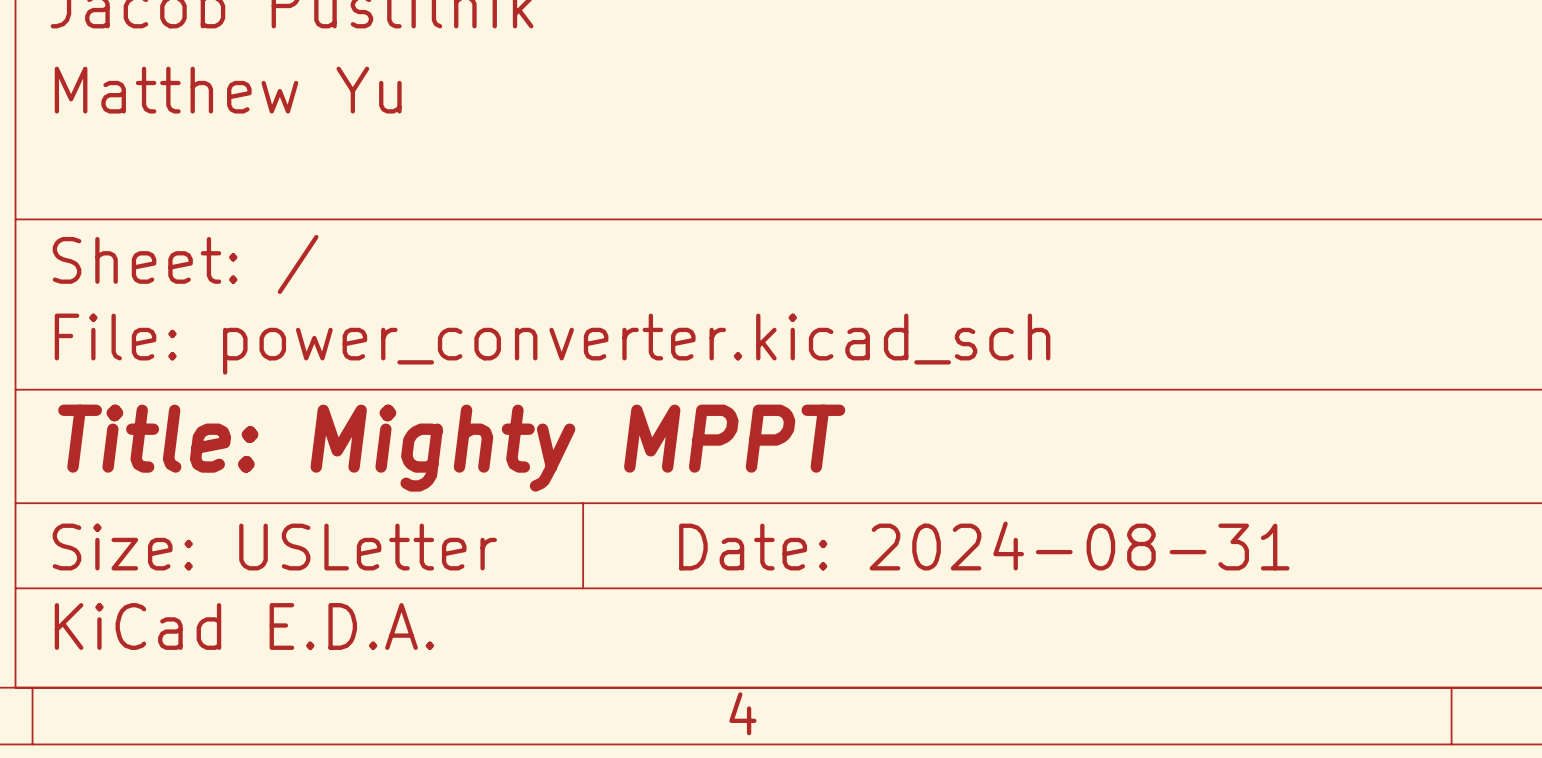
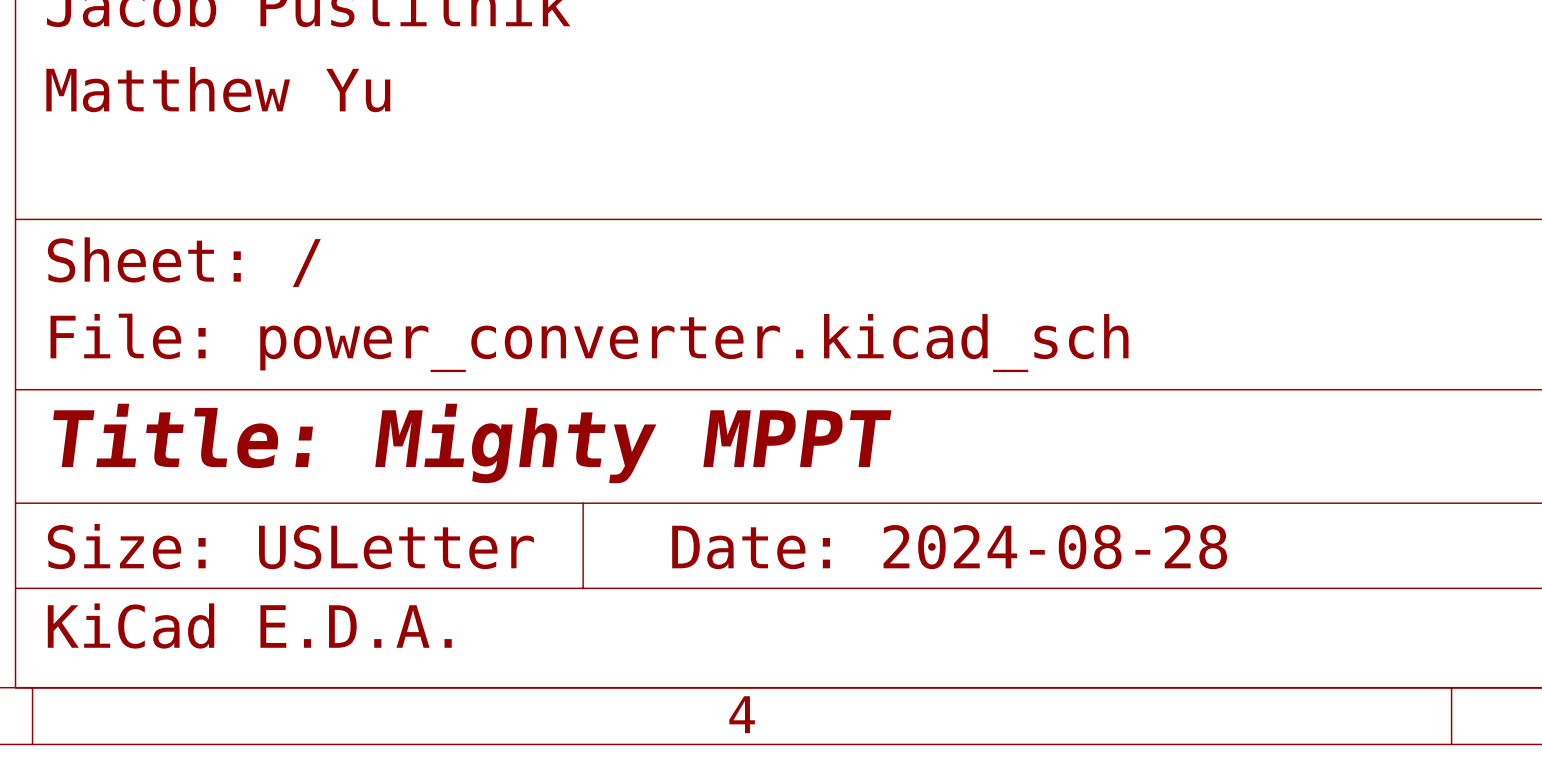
title block: Date: 2024-08-31 (984, 546) -> Date: 2024-08-28 (949, 547)

